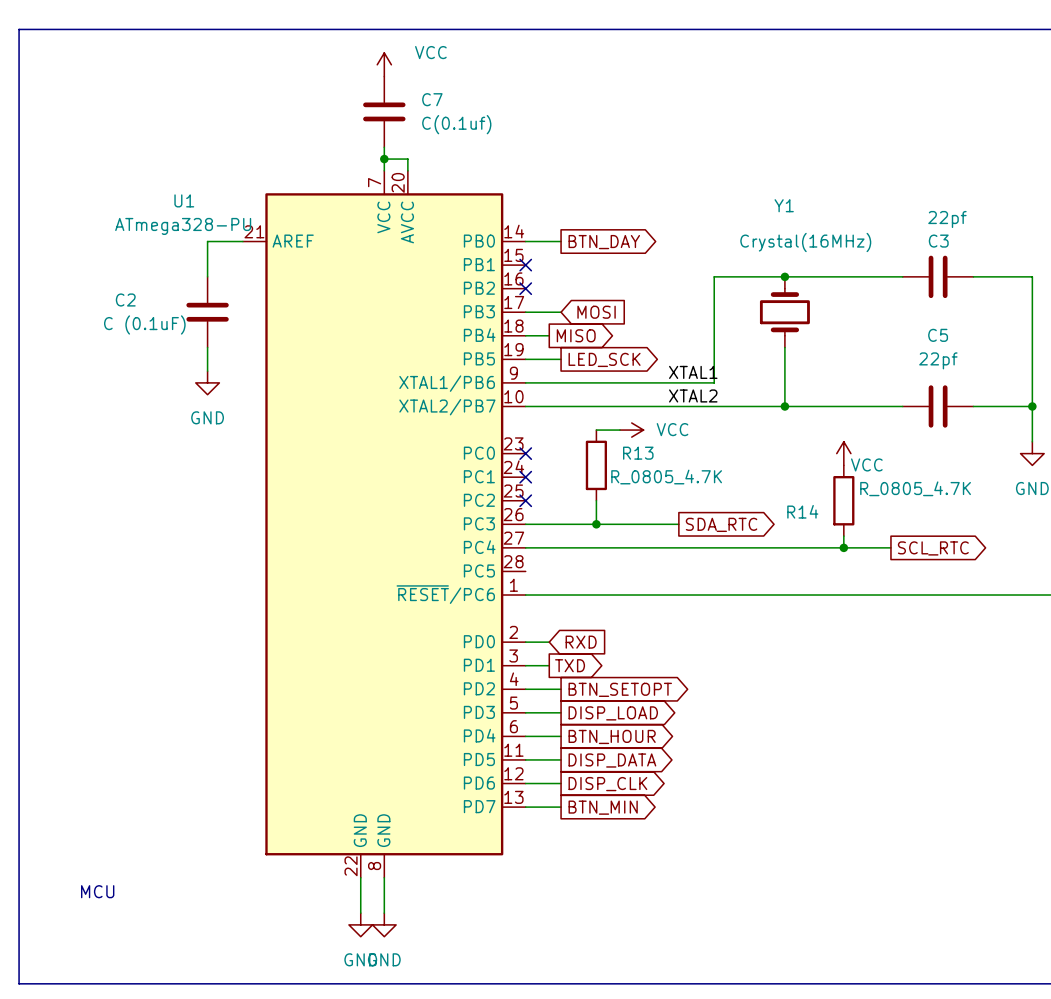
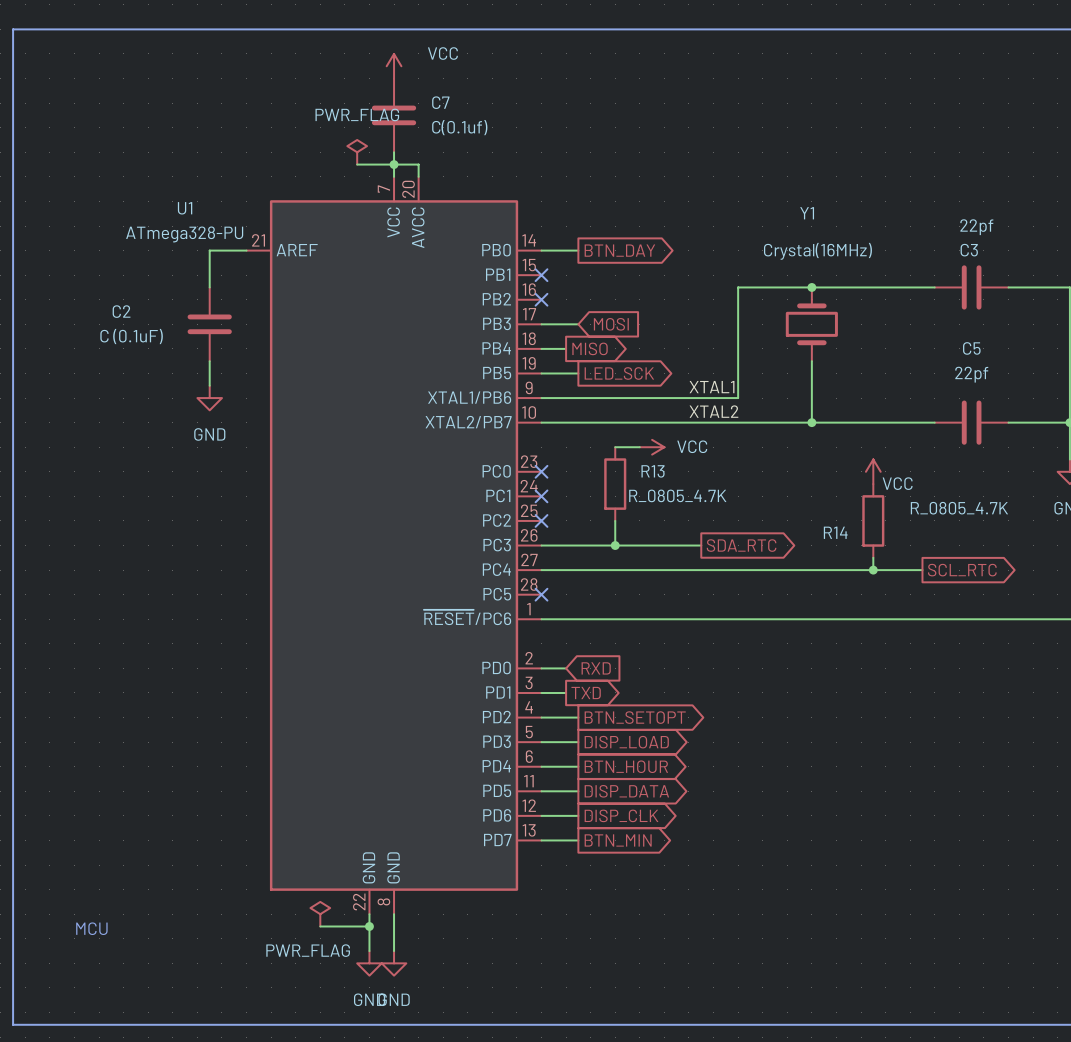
power symbol: none -> PWR_FLAG (357, 152)
wire: none -> (357, 164) (394, 164)
no-connect mark: none -> (541, 594)
power symbol: none -> PWR_FLAG (320, 914)
wire: none -> (320, 926) (369, 926)
junction: none -> (369, 926)

